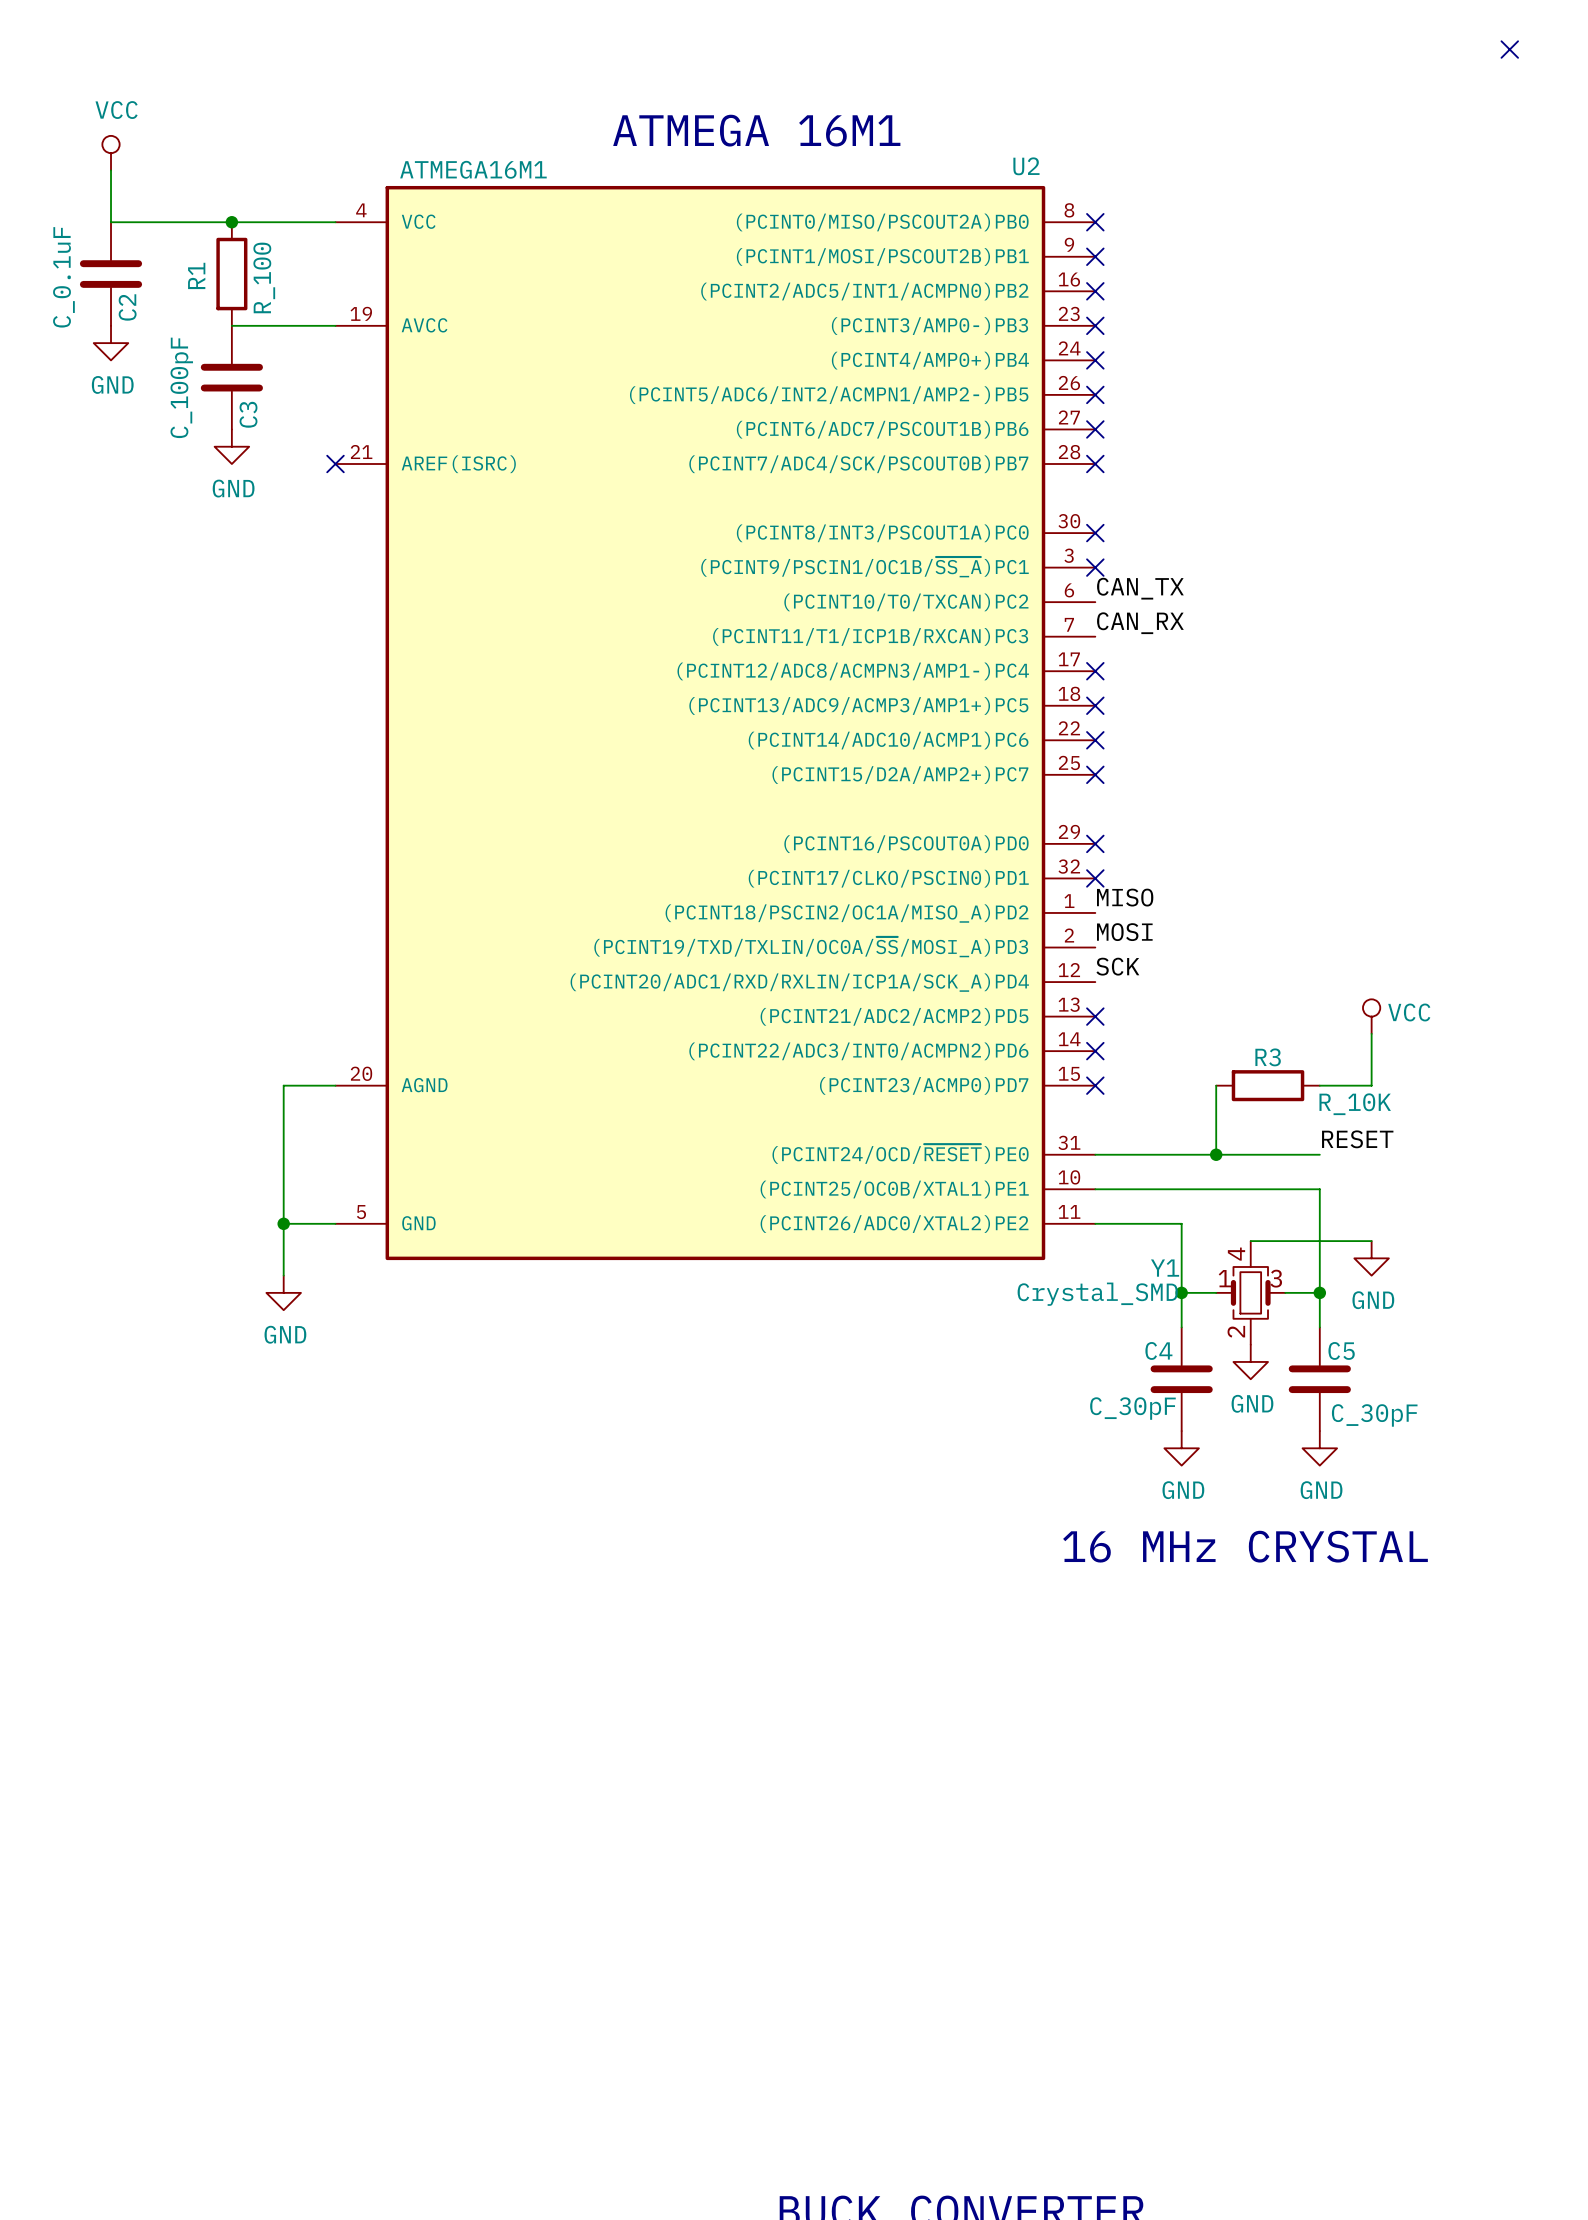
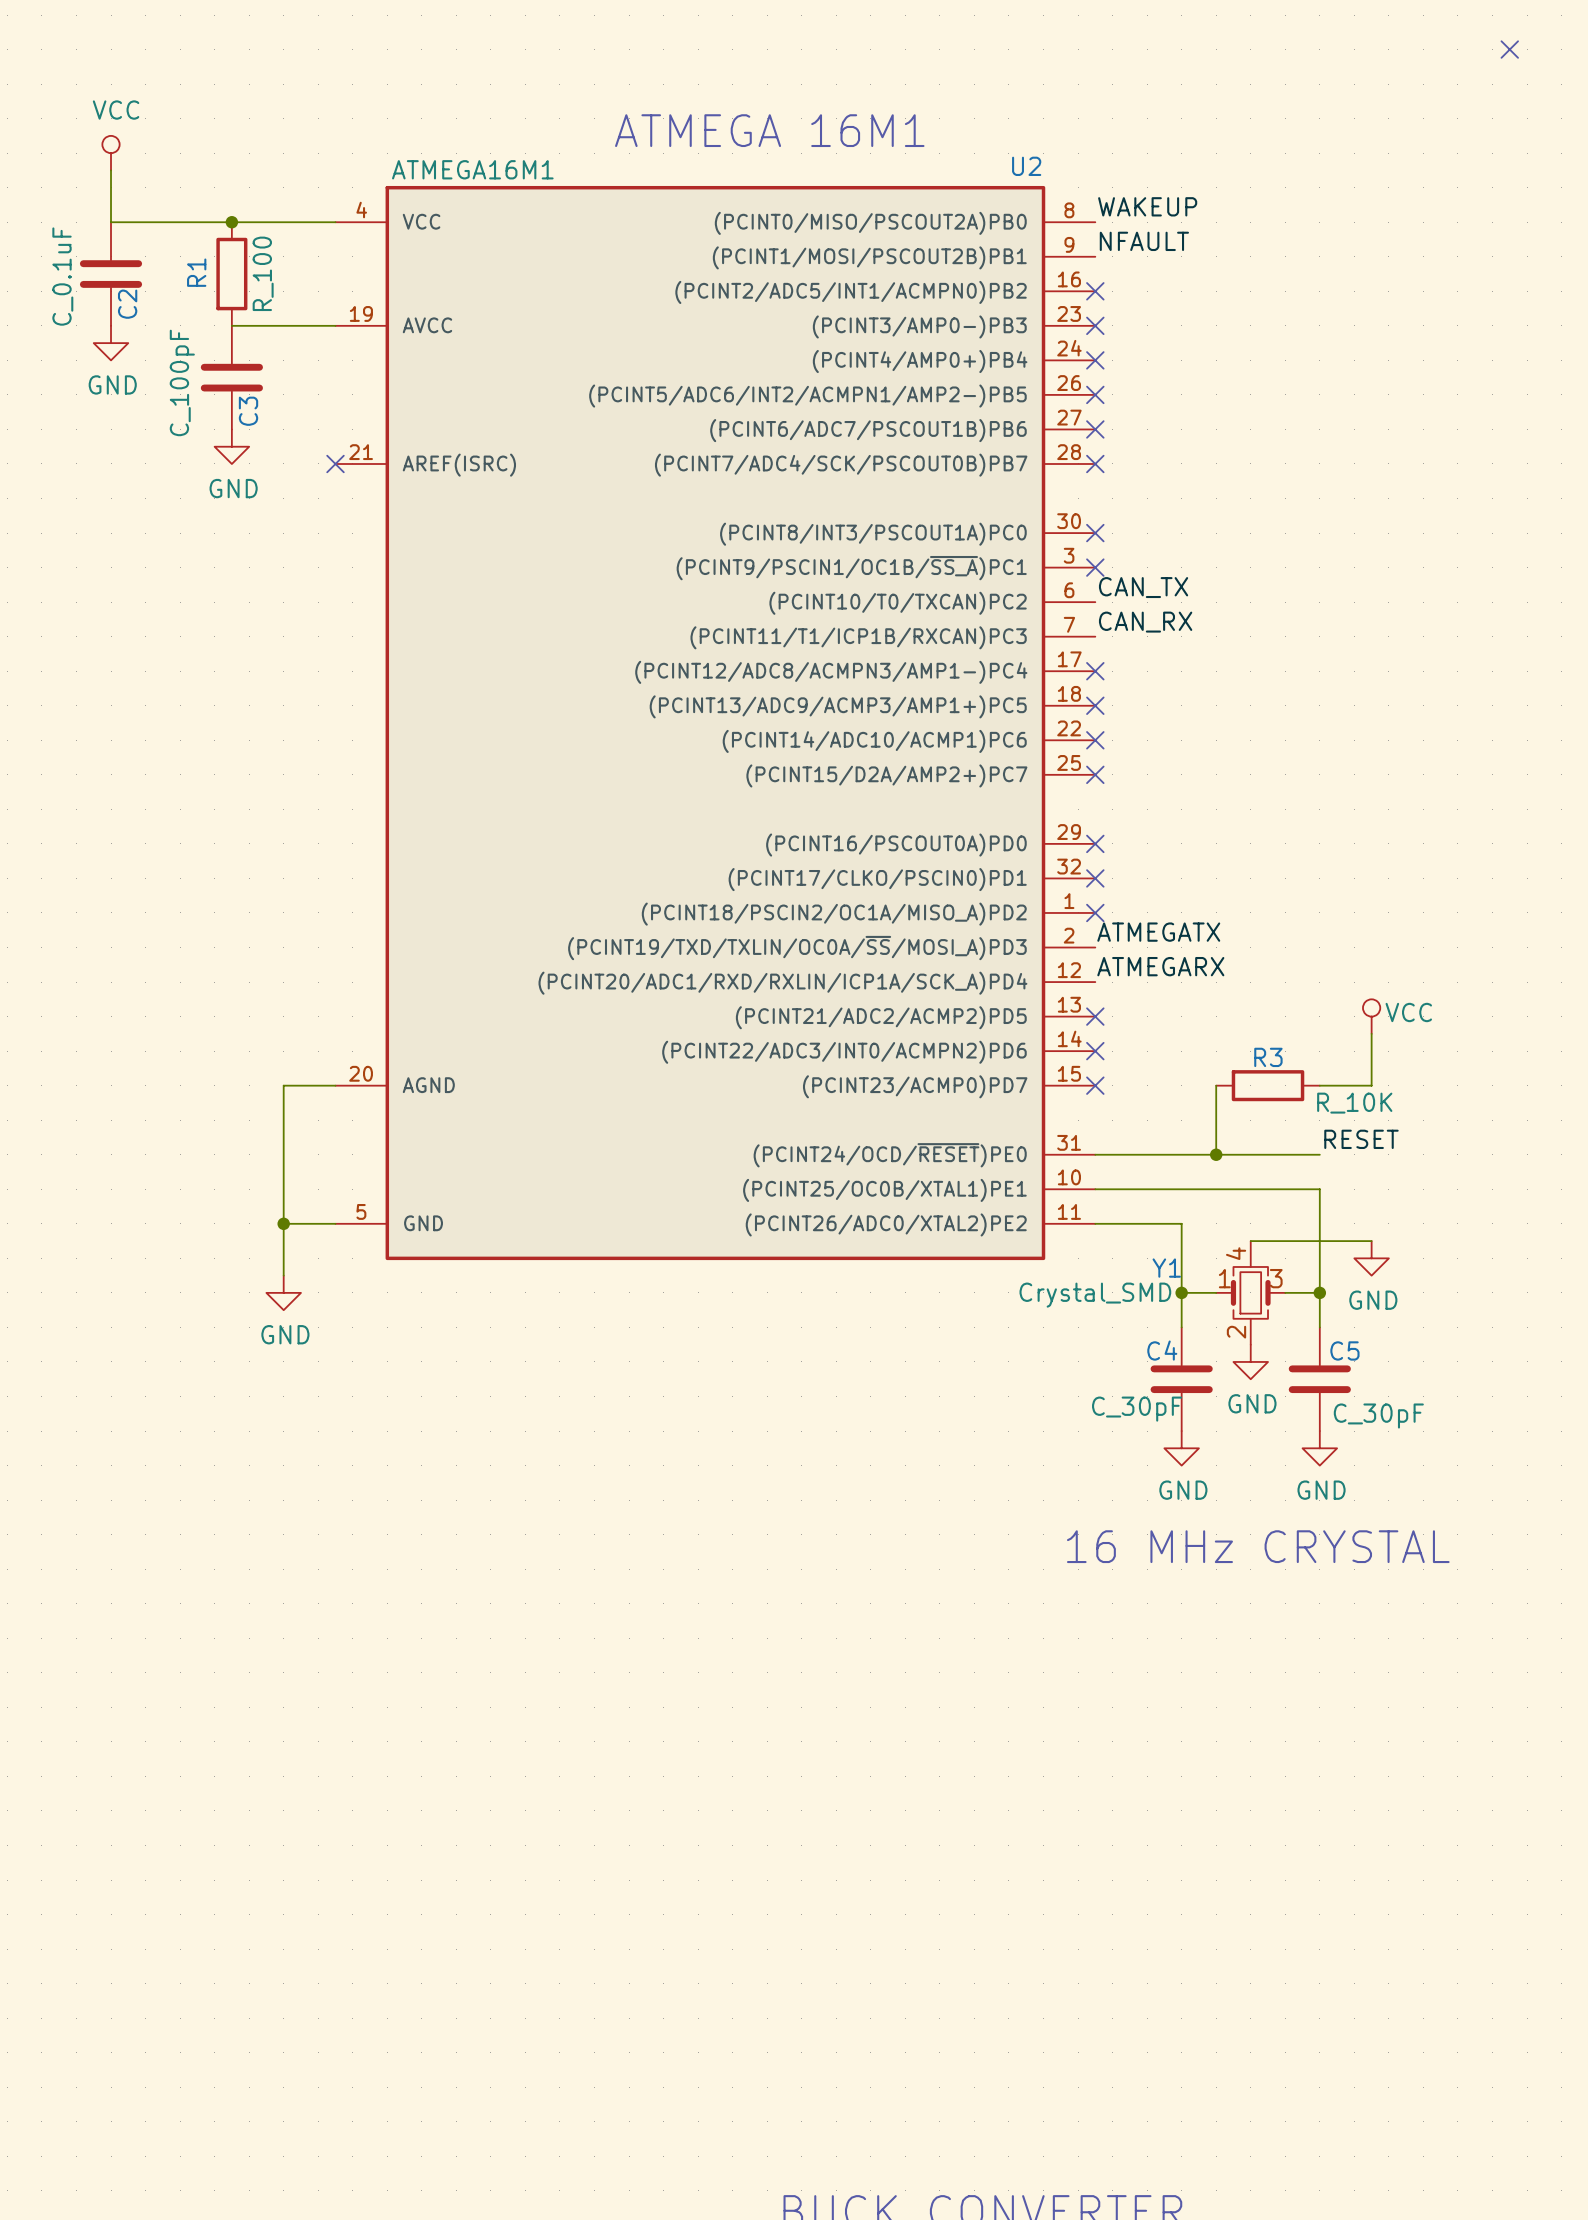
label: none -> WAKEUP (1147, 206)
no-connect mark: (1095, 222) -> none
label: none -> NFAULT (1144, 241)
no-connect mark: (1095, 256) -> none
label: MISO (1125, 897) -> none
no-connect mark: none -> (1095, 912)
label: MOSI (1124, 932) -> ATMEGATX (1158, 932)
label: SCK (1117, 966) -> ATMEGARX (1160, 966)

